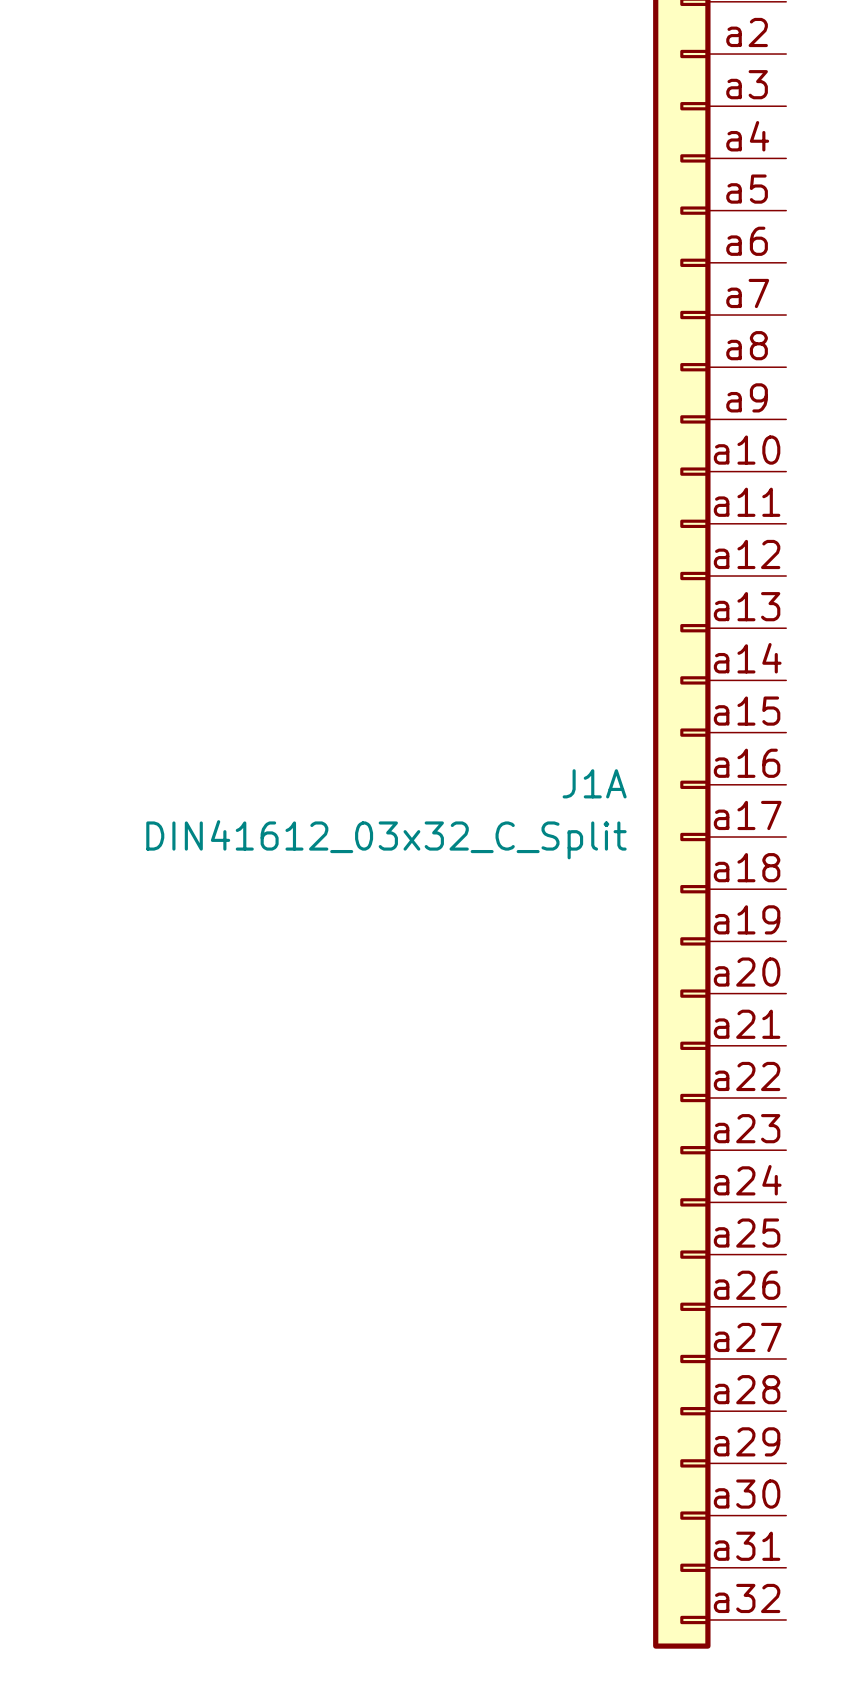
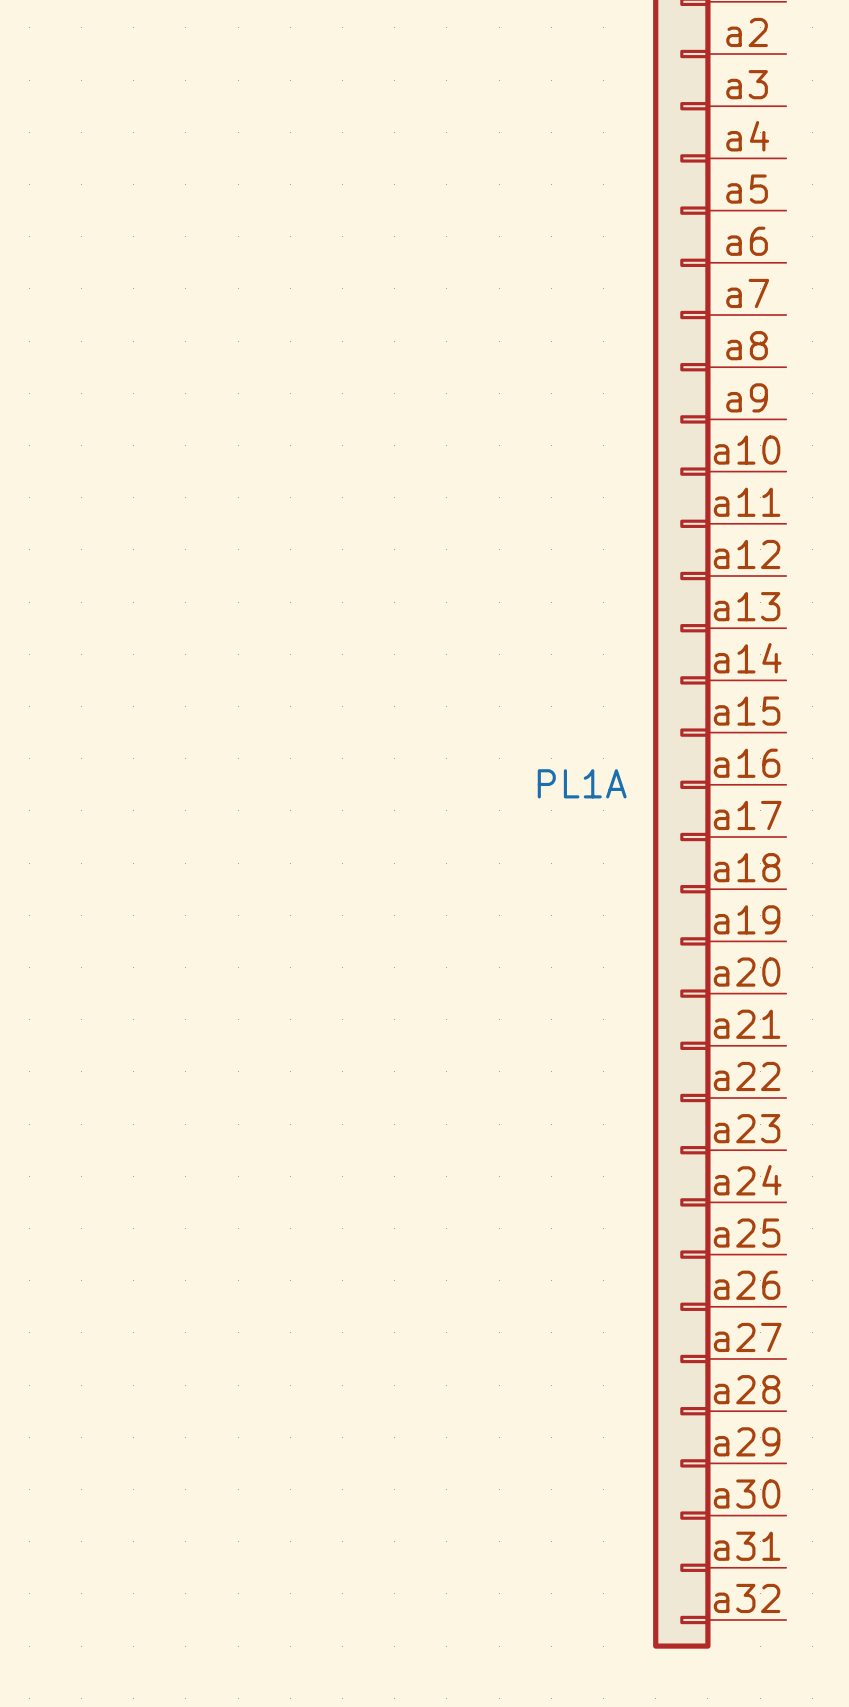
J1A name: J1A (594, 783) -> PL1A (582, 783)
J1A value: DIN41612_03x32_C_Split (386, 839) -> none

